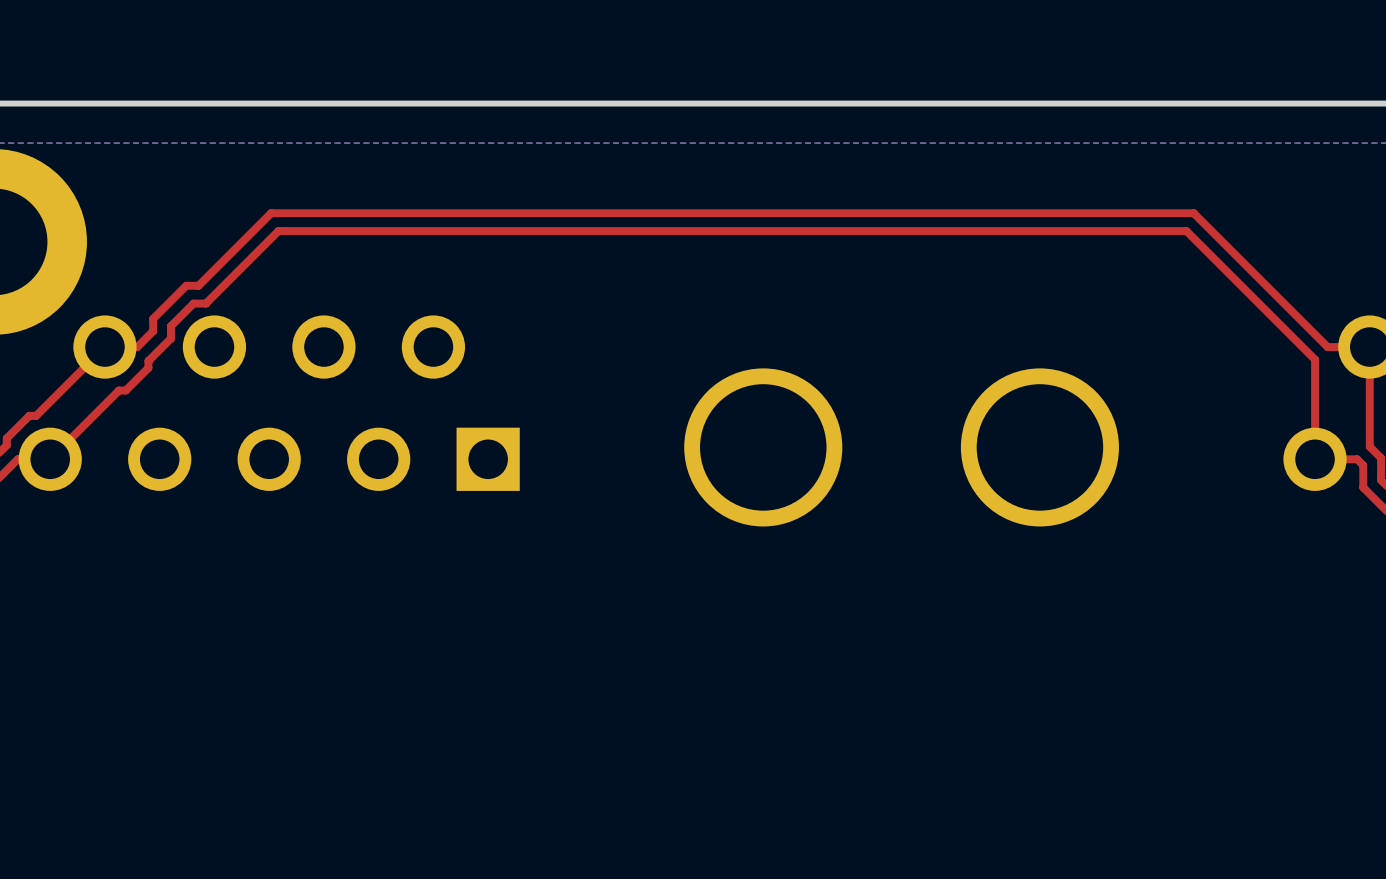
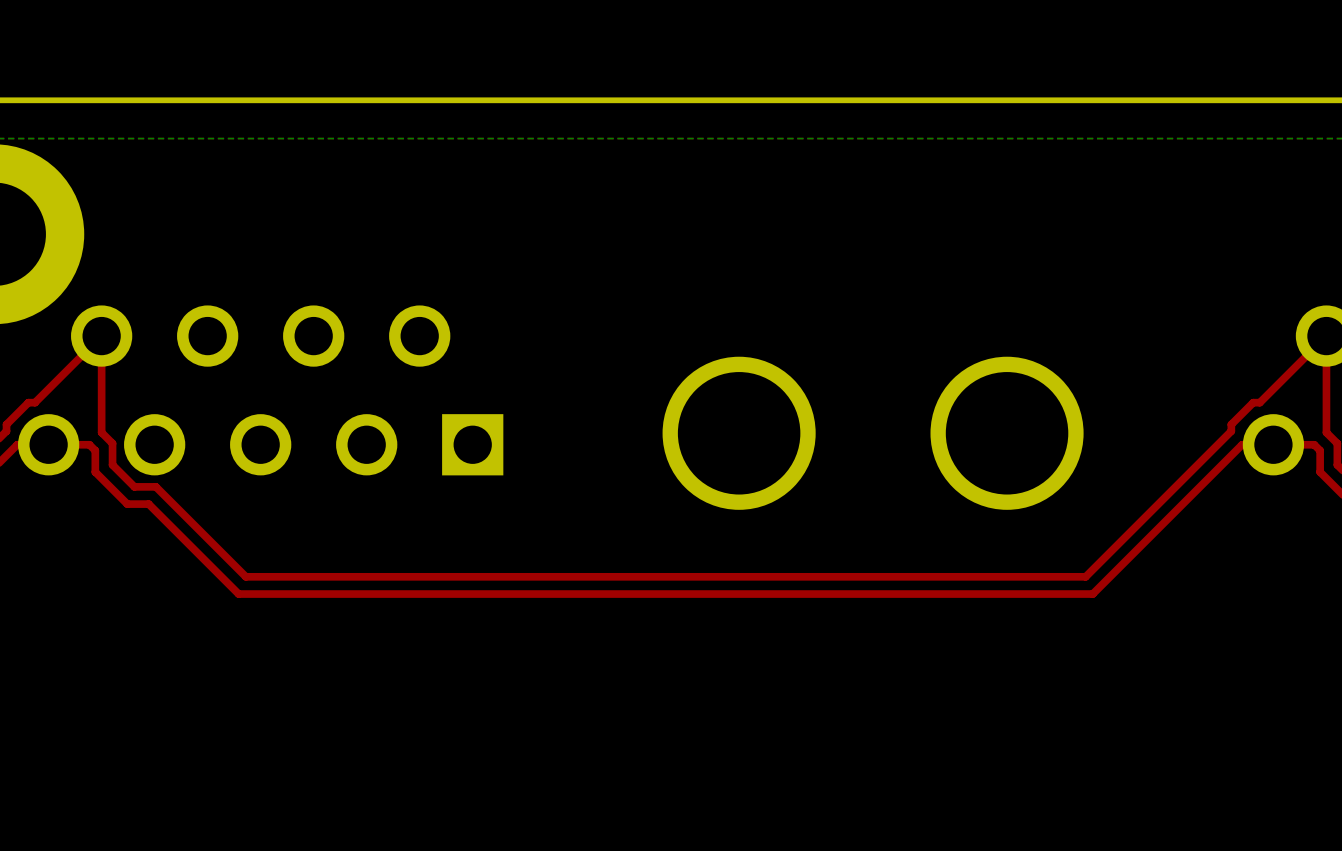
top track: (1369, 347) (1327, 347) (1193, 213) (271, 213) (198, 285) (186, 285) (153, 318) (153, 331) (137, 347) (104, 347) -> (1326, 336) (1259, 402) (1253, 402) (1231, 424) (1231, 431) (1085, 576) (245, 576) (155, 486) (134, 486) (112, 464) (112, 443) (101, 432) (101, 336)
top track: (1315, 459) (1315, 359) (1186, 231) (278, 231) (205, 303) (193, 303) (170, 326) (170, 338) (148, 361) (148, 367) (125, 390) (118, 390) (50, 459) -> (1273, 444) (1242, 444) (1092, 594) (238, 594) (148, 504) (127, 504) (95, 472) (95, 450) (89, 444) (48, 444)

